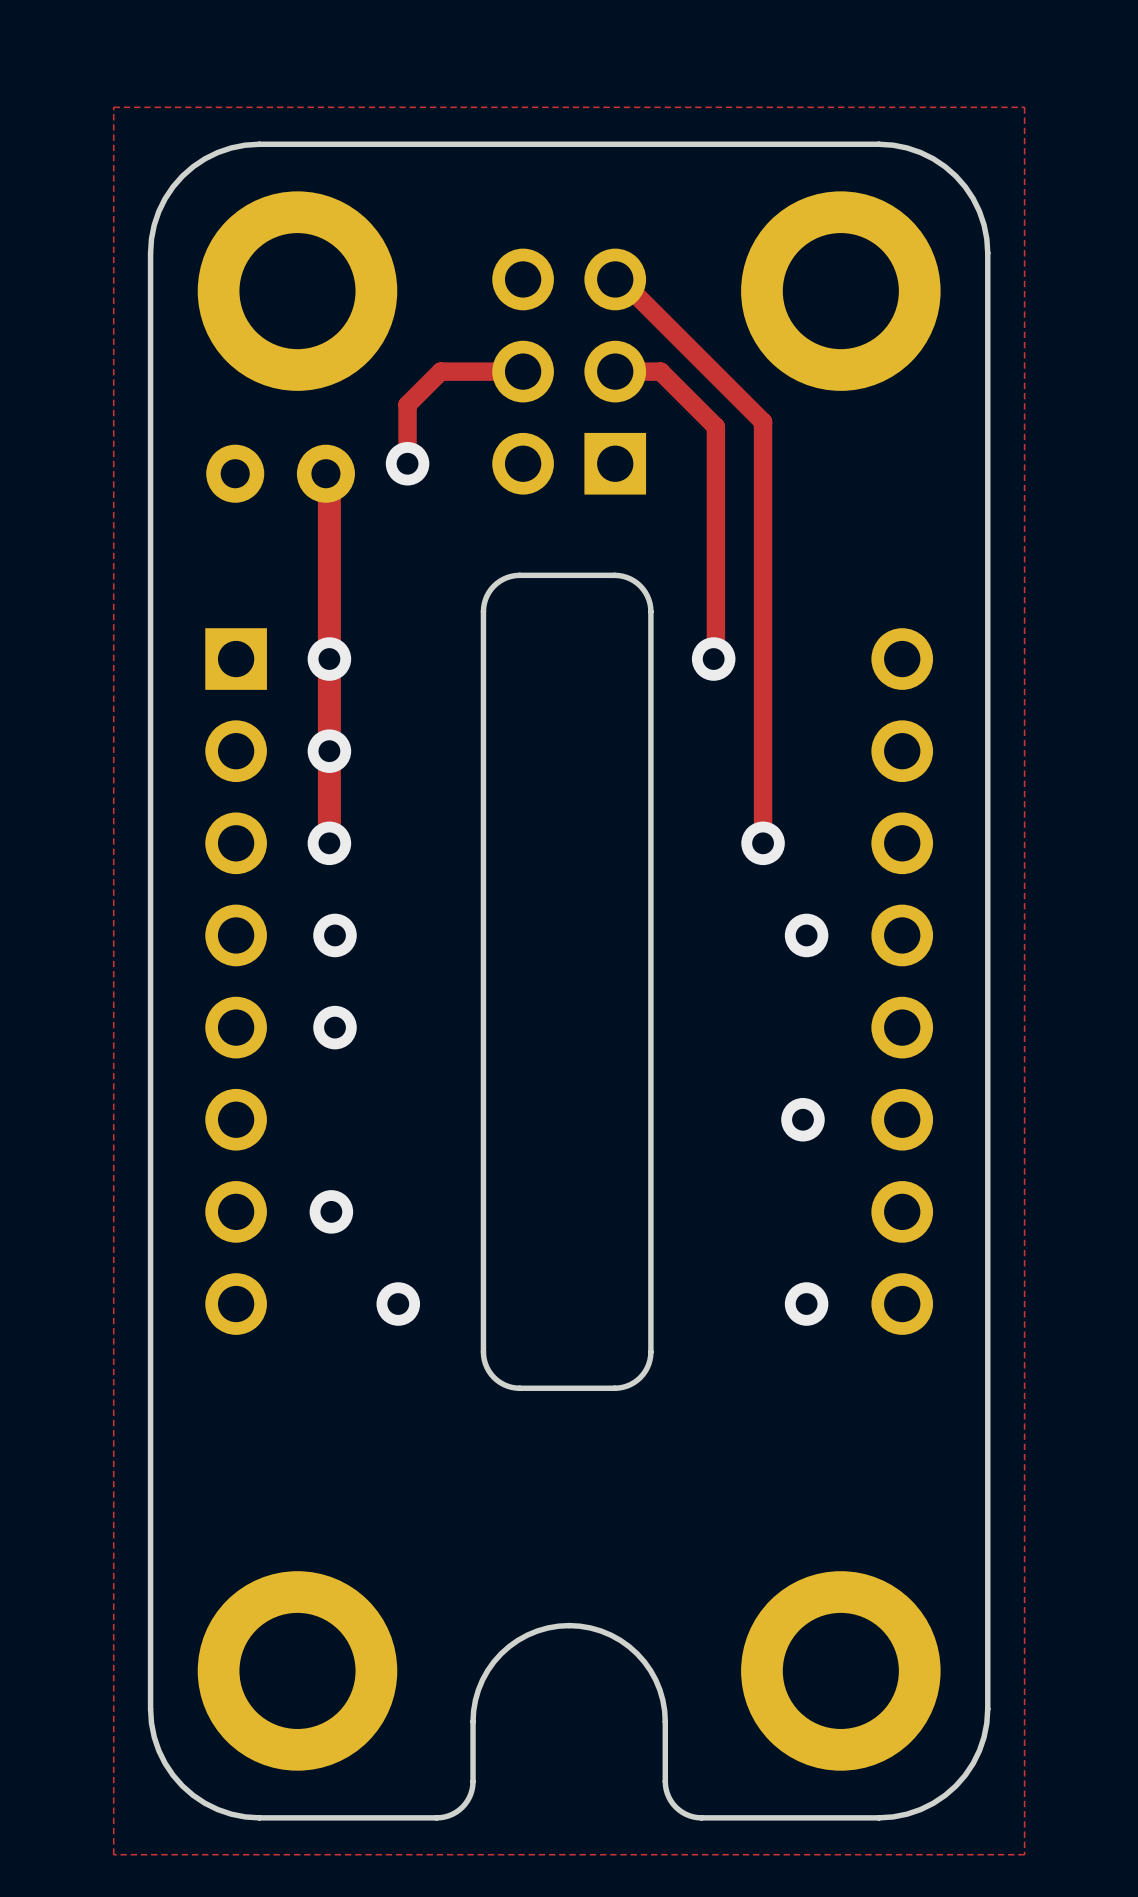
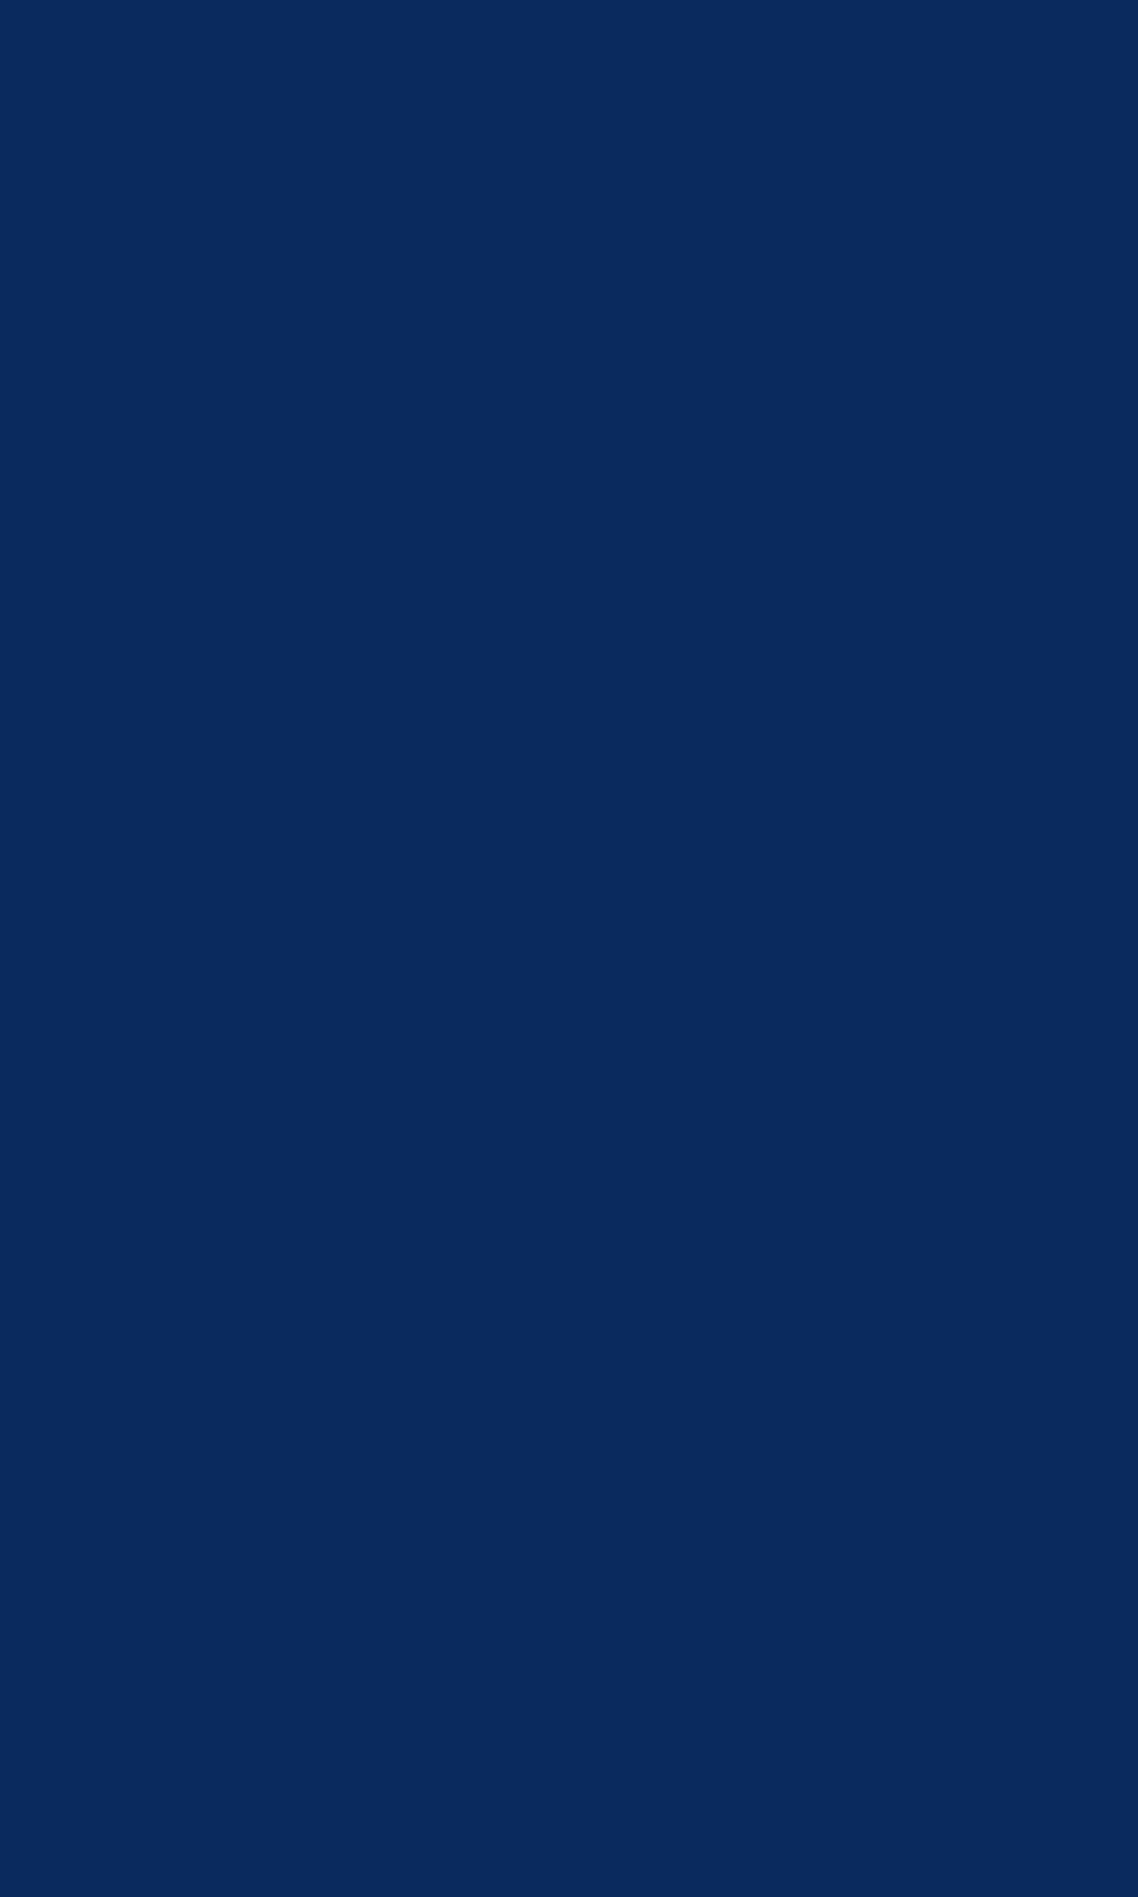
zone outline: (113, 107) (113, 1854) (1024, 1854) (1024, 107) (113, 107) -> none
board edge: (259, 144) (893, 145) (920, 152) (945, 166) (965, 186) (979, 211) (986, 238) (987, 253) (987, 1709) (984, 1737) (973, 1763) (965, 1775) (945, 1795) (920, 1809) (907, 1814) (878, 1817) (701, 1817) (685, 1814) (673, 1804) (666, 1789) (664, 1710) (659, 1689) (650, 1670) (637, 1653) (620, 1640) (600, 1630) (579, 1626) (547, 1628) (527, 1635) (509, 1646) (487, 1670) (478, 1689) (473, 1710) (472, 1789) (465, 1804) (448, 1815) (436, 1817) (259, 1817) (231, 1814) (204, 1803) (193, 1795) (173, 1775) (158, 1750) (154, 1737) (150, 1709) (150, 253) (151, 238) (158, 211) (173, 186) (182, 176) (204, 158) (217, 152) (231, 147) (259, 144) -> none
track: (615, 279) (620, 279) (763, 421) (763, 839) (765, 841) -> none
part: (297, 291) -> none
part: (840, 291) -> none
track: (523, 371) (440, 371) (407, 404) (407, 462) -> none
part: (569, 371) -> none
track: (615, 371) (660, 371) (715, 426) (715, 656) (713, 658) -> none
via: (407, 463) -> none
part: (280, 473) -> none
track: (316, 473) (329, 486) (329, 843) -> none
board edge: (519, 575) (622, 576) (633, 580) (642, 589) (650, 607) (650, 1351) (648, 1363) (640, 1377) (630, 1384) (618, 1388) (511, 1387) (494, 1377) (487, 1367) (483, 1356) (483, 611) (485, 599) (494, 585) (507, 577) (519, 575) -> none
via: (329, 659) -> none
via: (713, 659) -> none
via: (329, 751) -> none
via: (329, 843) -> none
via: (763, 843) -> none
via: (335, 935) -> none
via: (806, 935) -> none
part: (236, 981) -> none
part: (902, 981) -> none
via: (335, 1027) -> none
via: (802, 1119) -> none
via: (331, 1211) -> none
via: (398, 1304) -> none
via: (806, 1304) -> none
part: (297, 1670) -> none
part: (840, 1670) -> none

